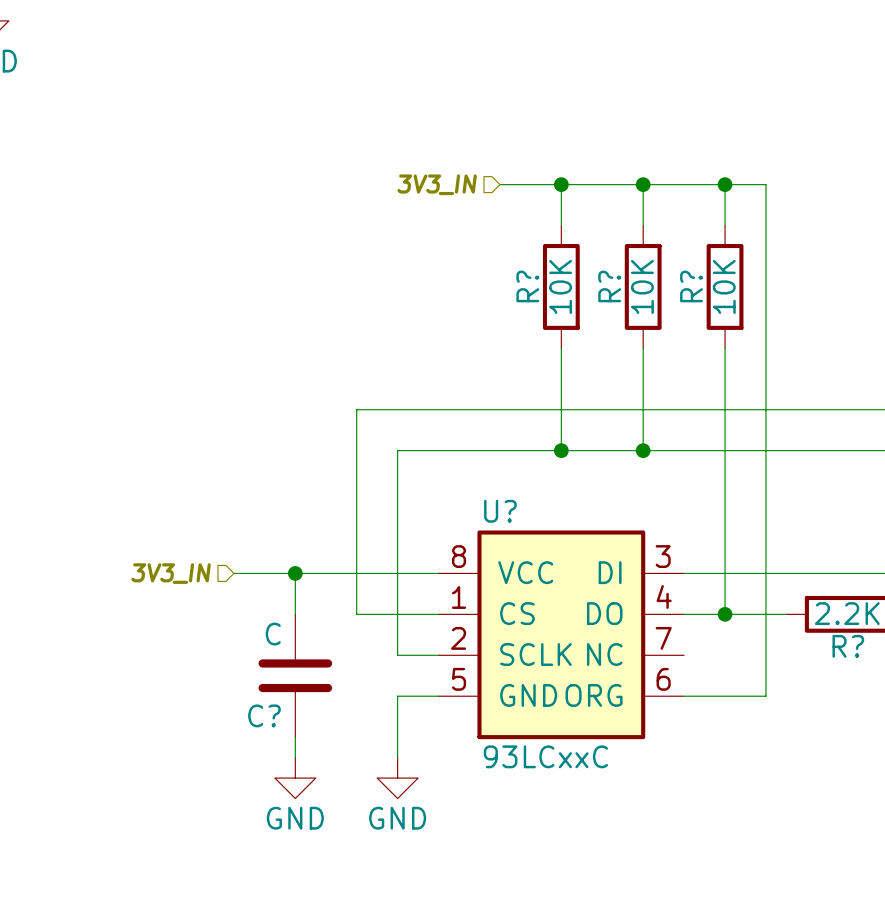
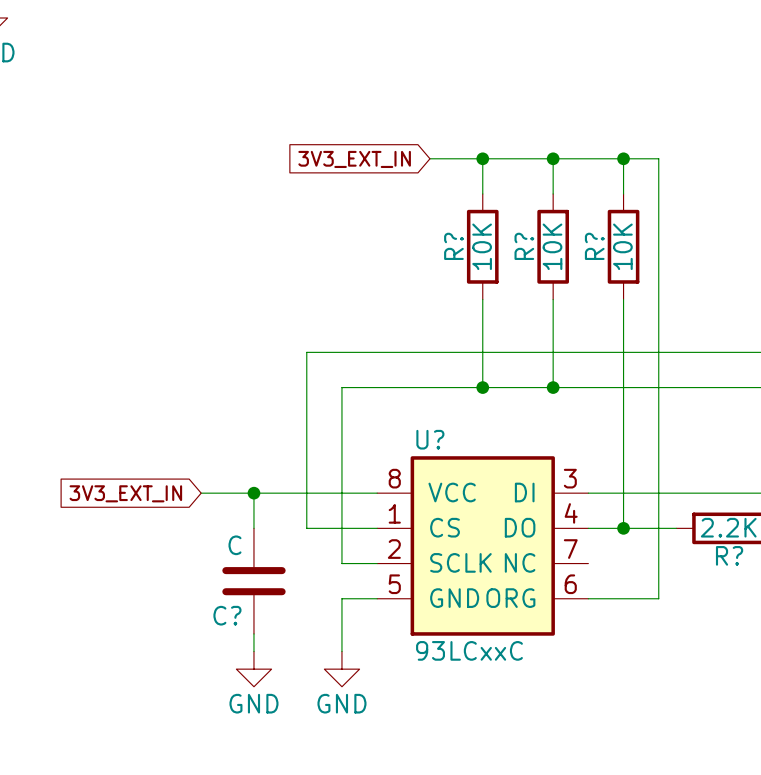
hierarchical label: 3V3_IN (437, 184) -> none
global label: none -> 3V3_EXT_IN (354, 159)
hierarchical label: 3V3_IN (171, 573) -> none
global label: none -> 3V3_EXT_IN (125, 493)

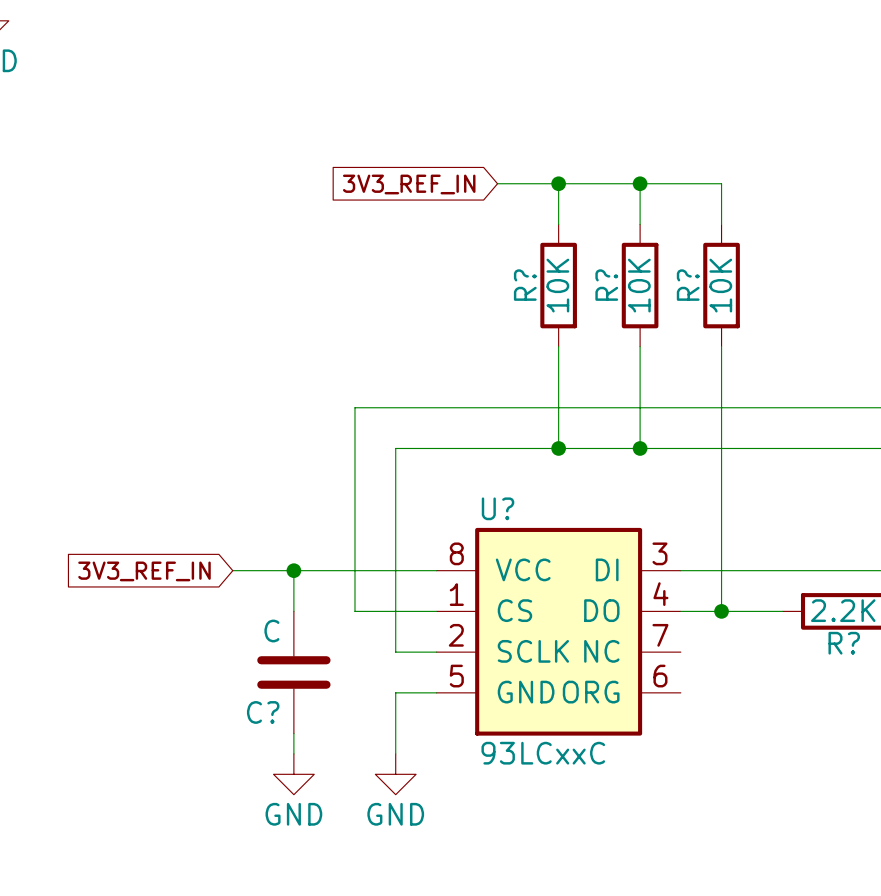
wire: (623, 158) (658, 158) (658, 598) (588, 598) -> none
junction: (623, 158) -> none
global label: 3V3_EXT_IN (354, 159) -> 3V3_REF_IN (409, 184)
global label: 3V3_EXT_IN (125, 493) -> 3V3_REF_IN (144, 571)

